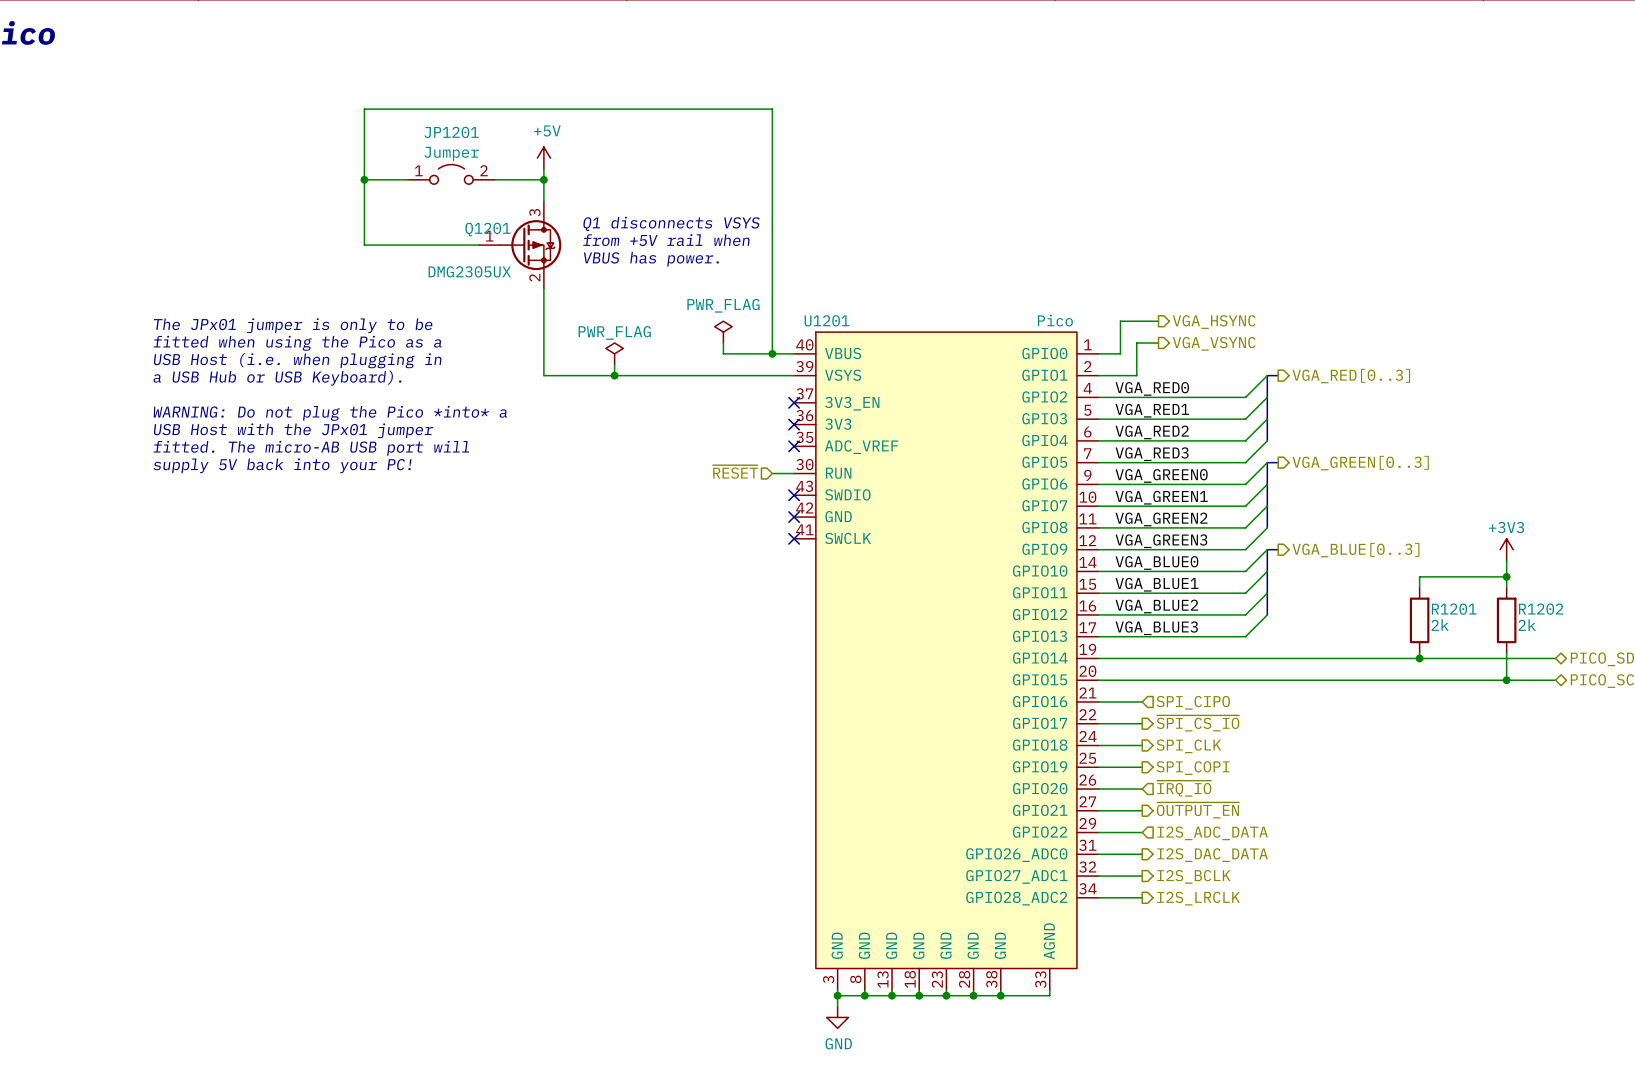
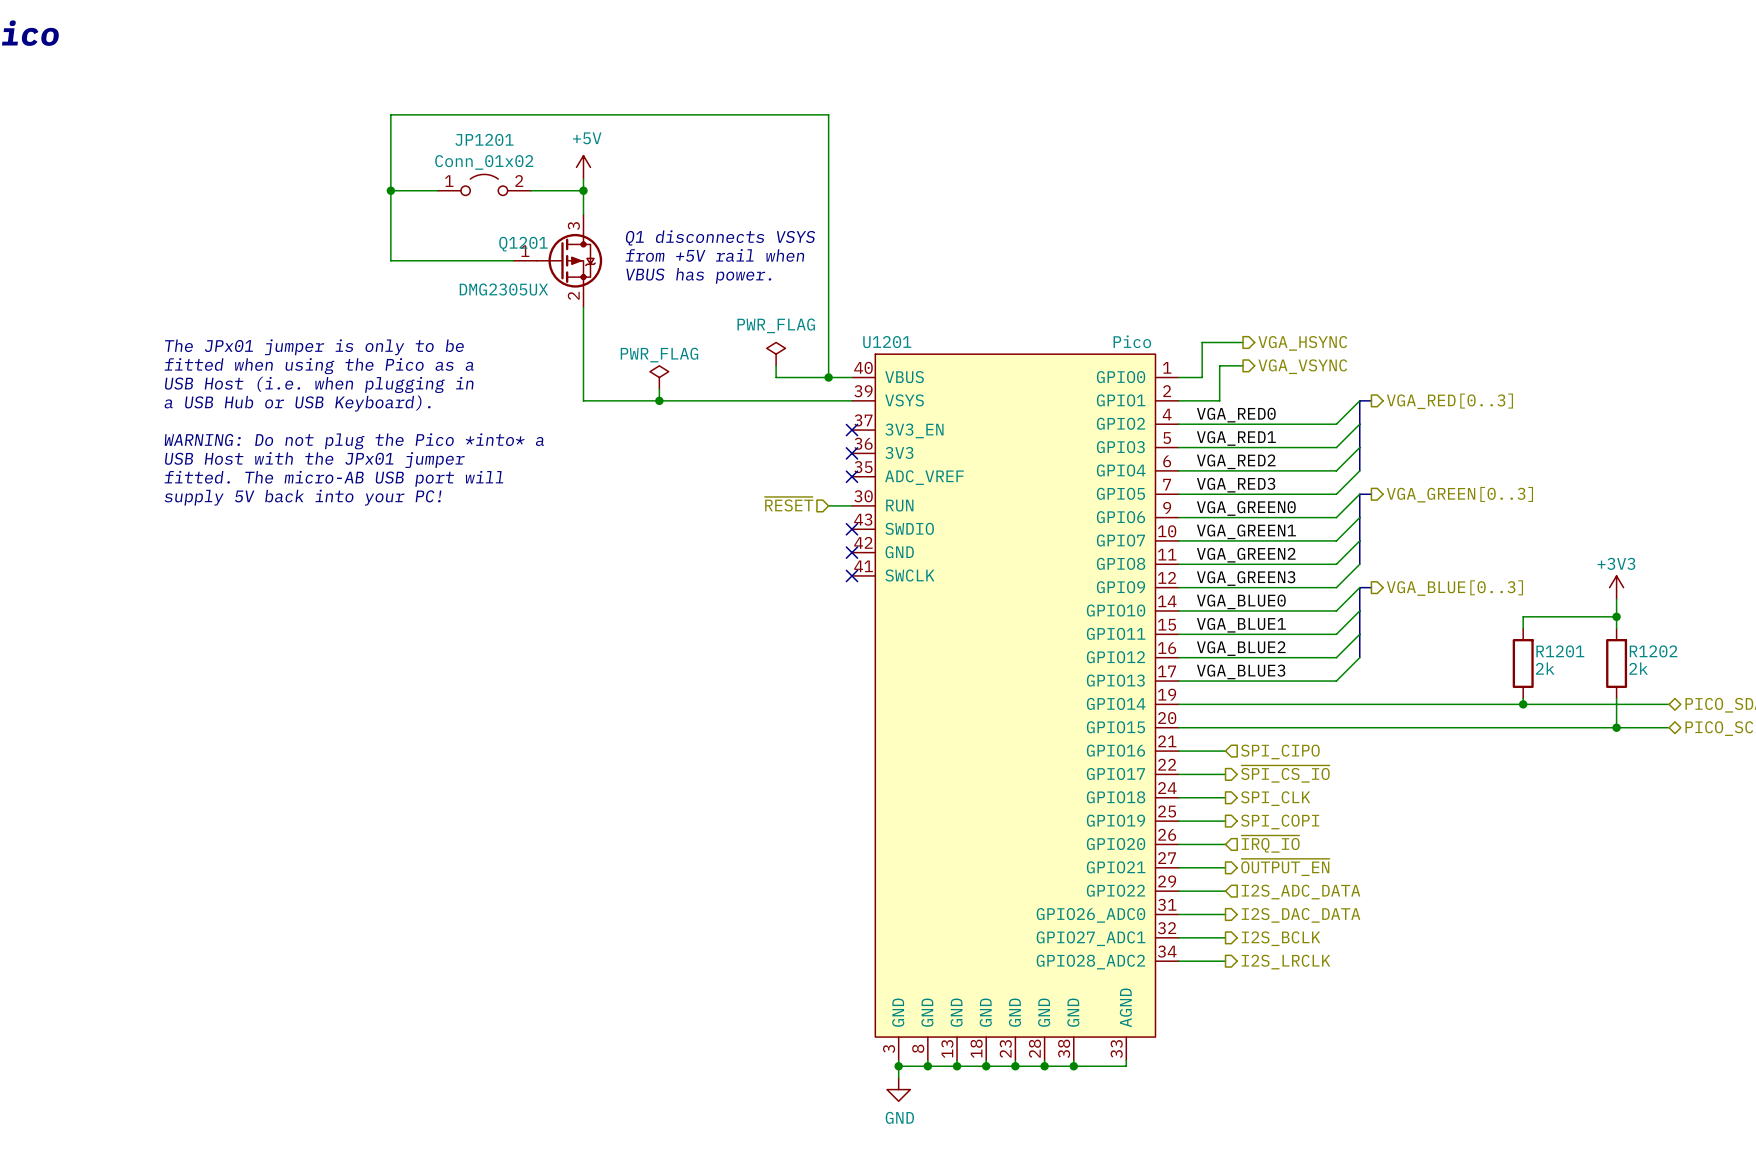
JP1201 value: Jumper (451, 153) -> Conn_01x02 (484, 162)

